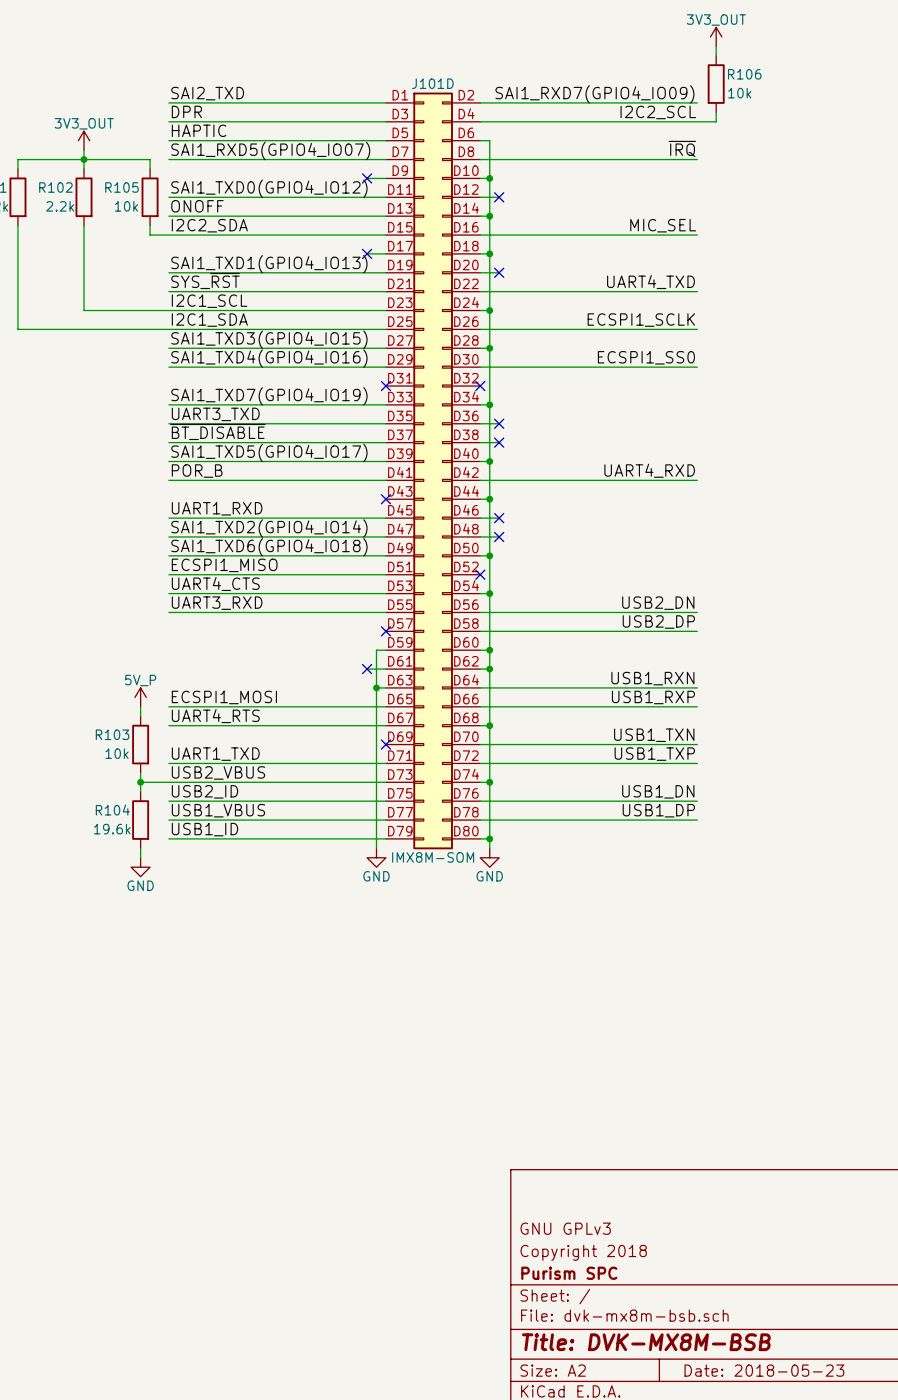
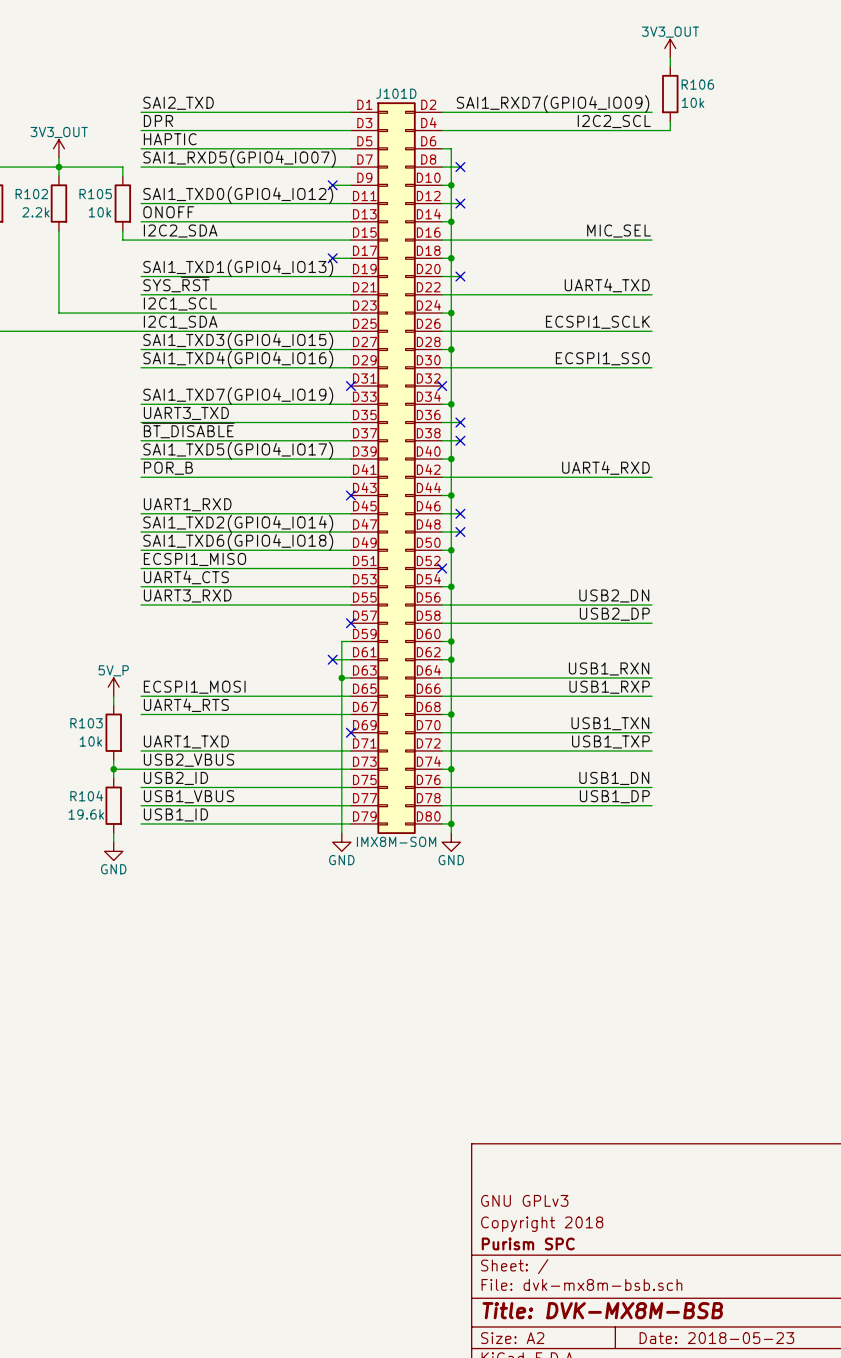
label: ~{IRQ} (682, 148) -> none
wire: (499, 159) (697, 159) -> none
no-connect mark: none -> (460, 167)

